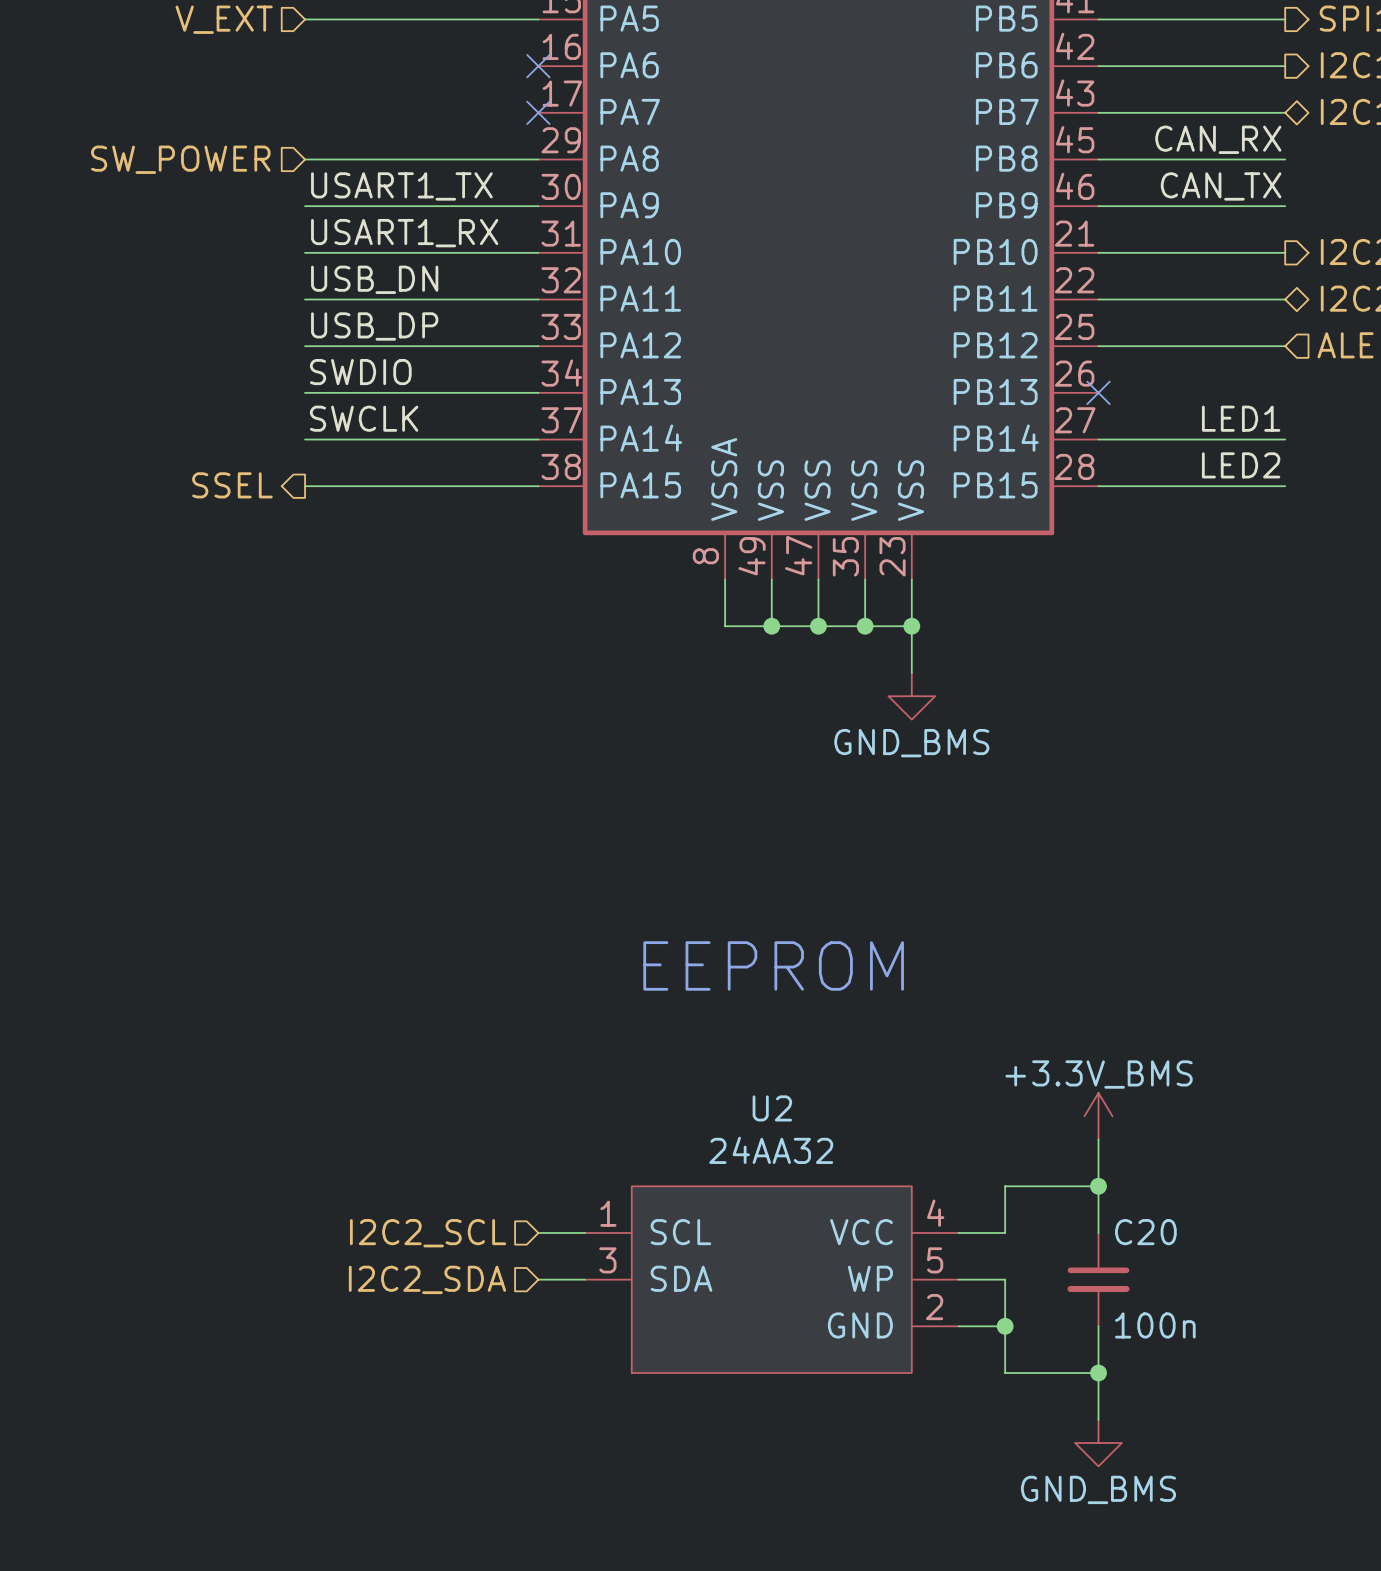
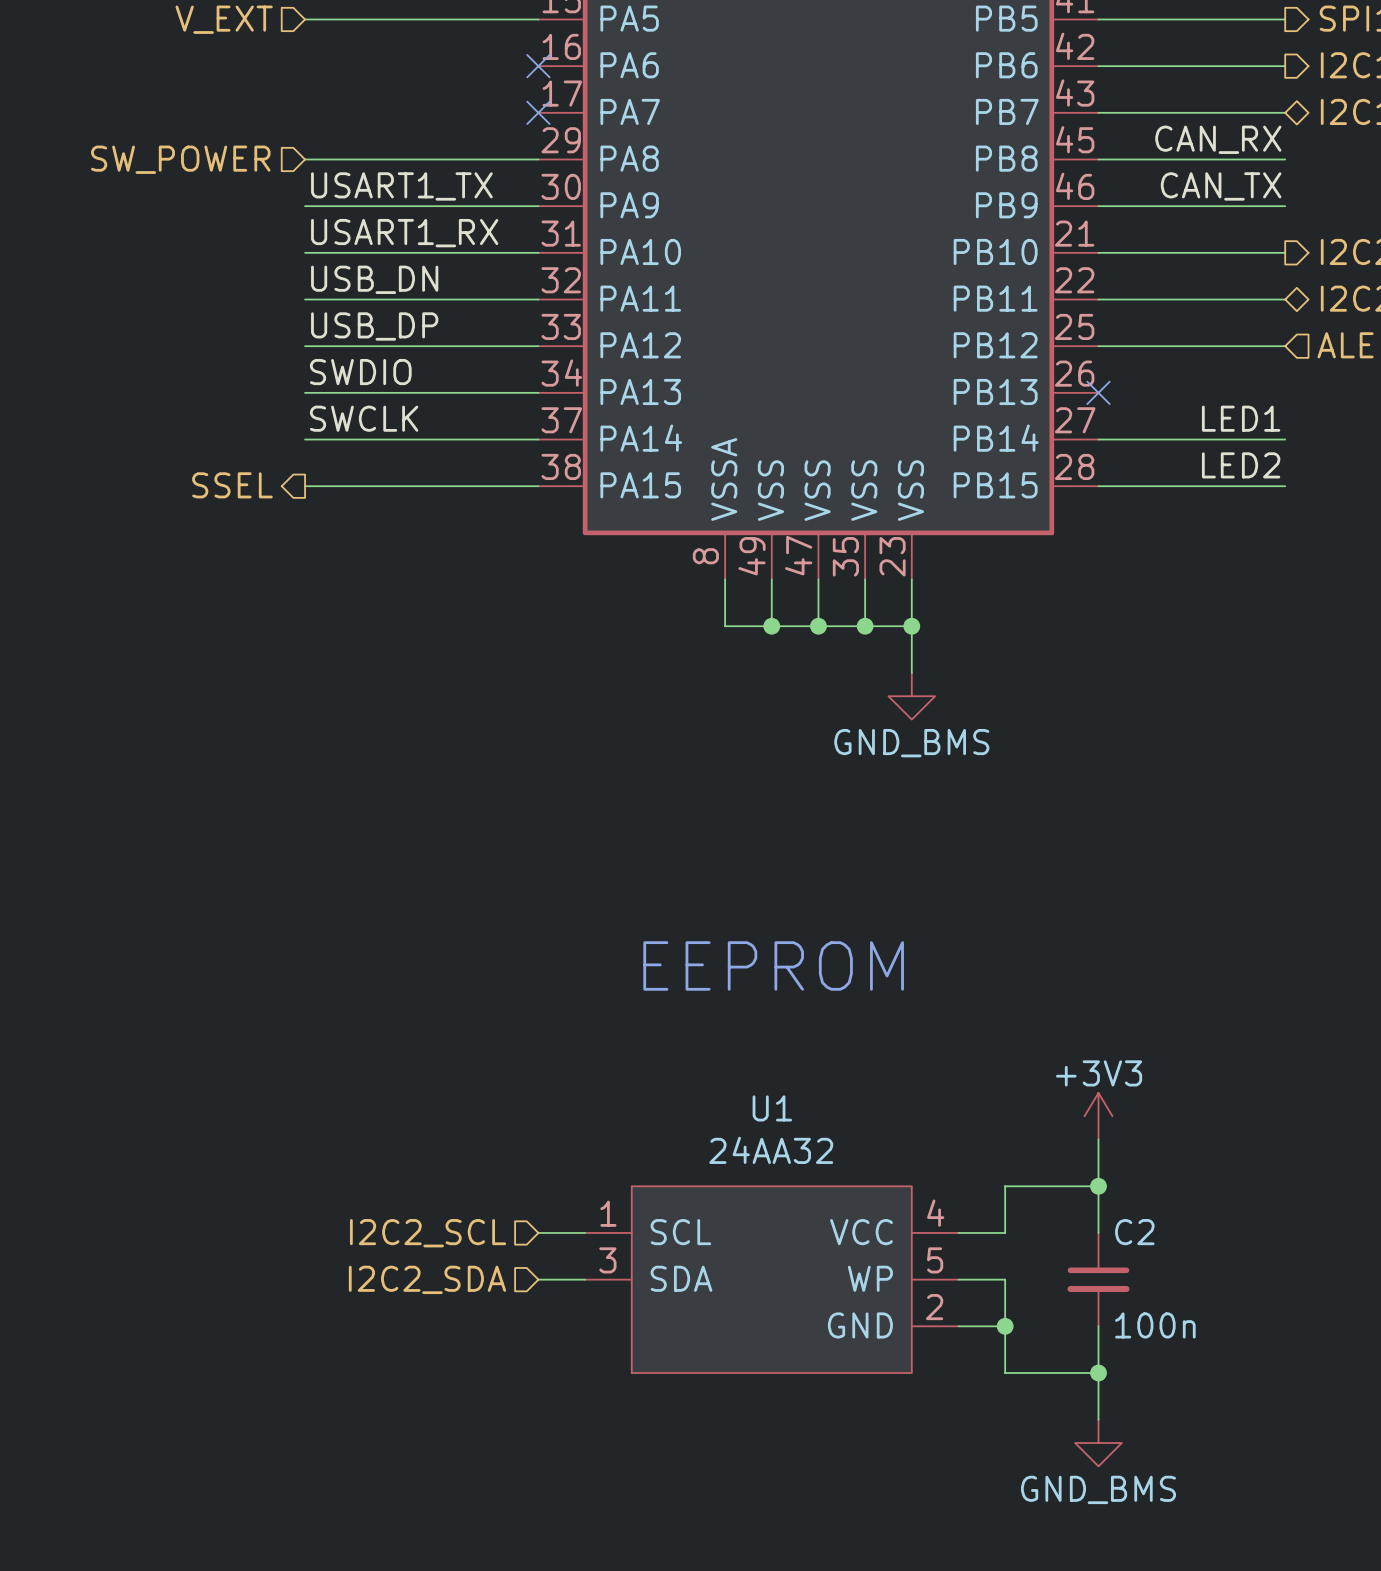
U2 name: U2 (772, 1108) -> U1 (772, 1108)
power symbol: +3.3V_BMS (1098, 1116) -> +3V3 (1098, 1116)
C20 name: C20 (1145, 1232) -> C2 (1134, 1232)

